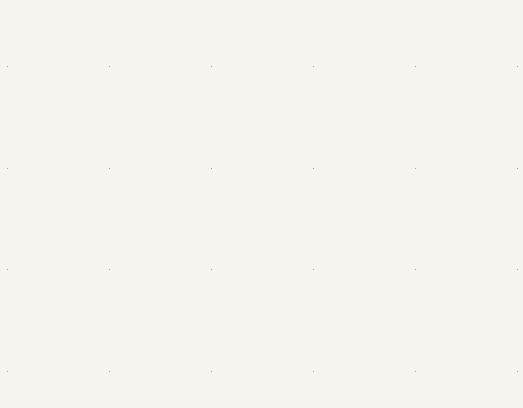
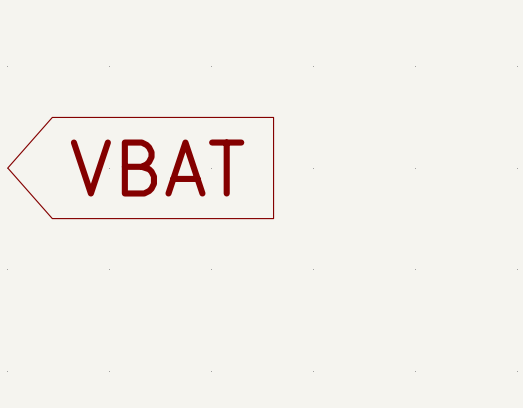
global label: none -> VBAT (157, 168)

